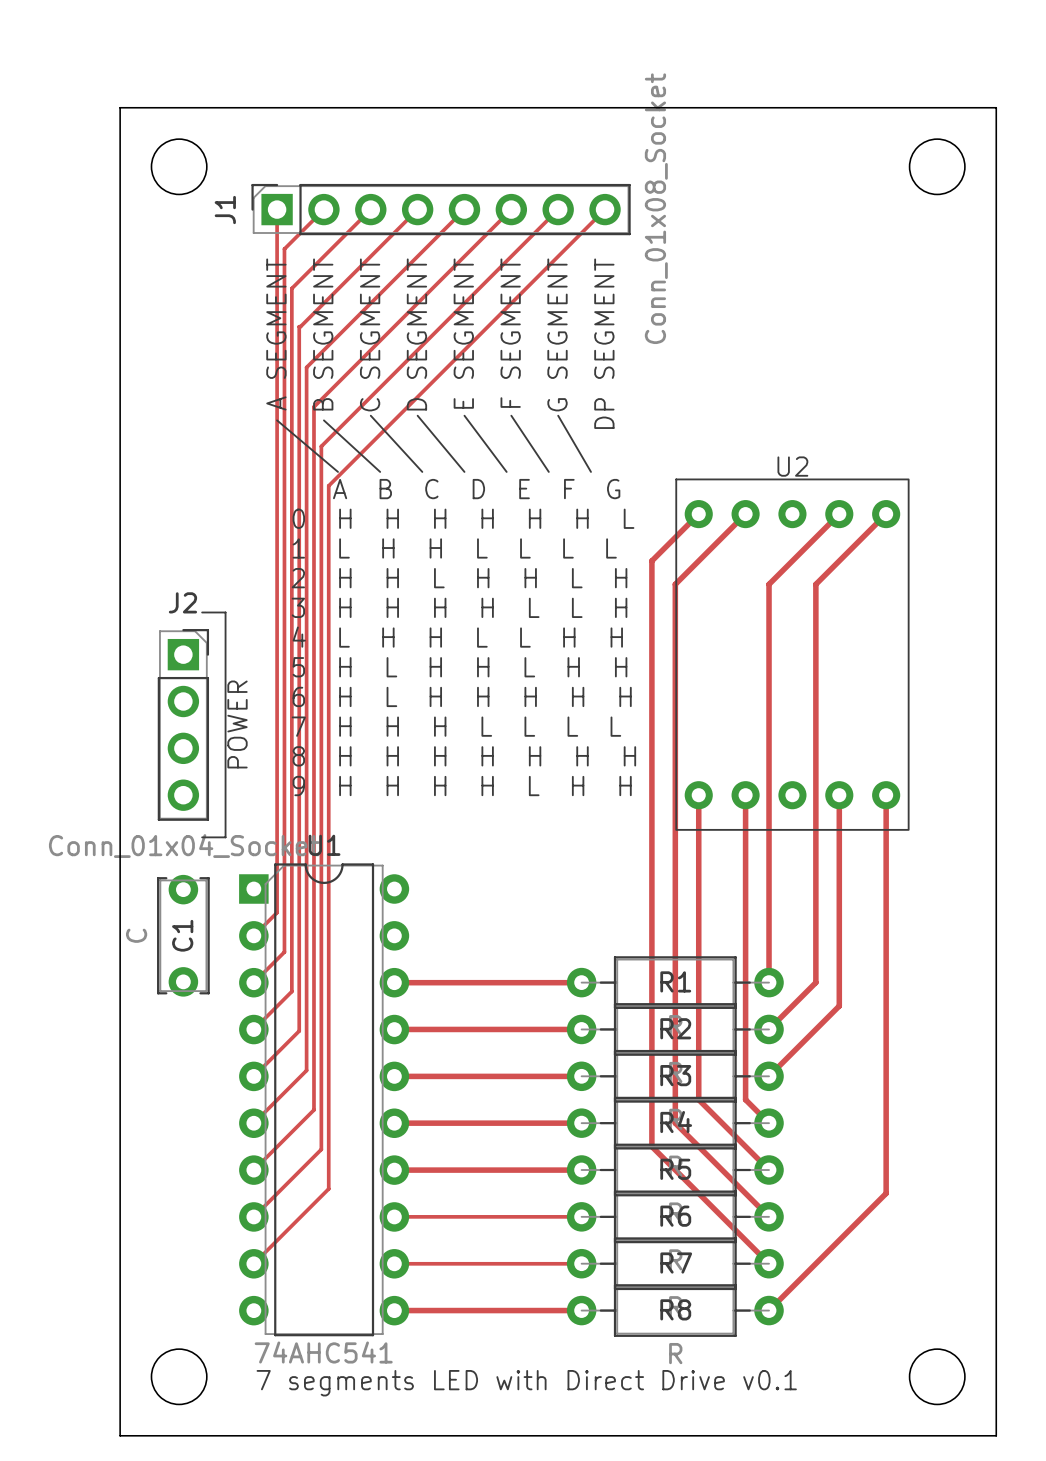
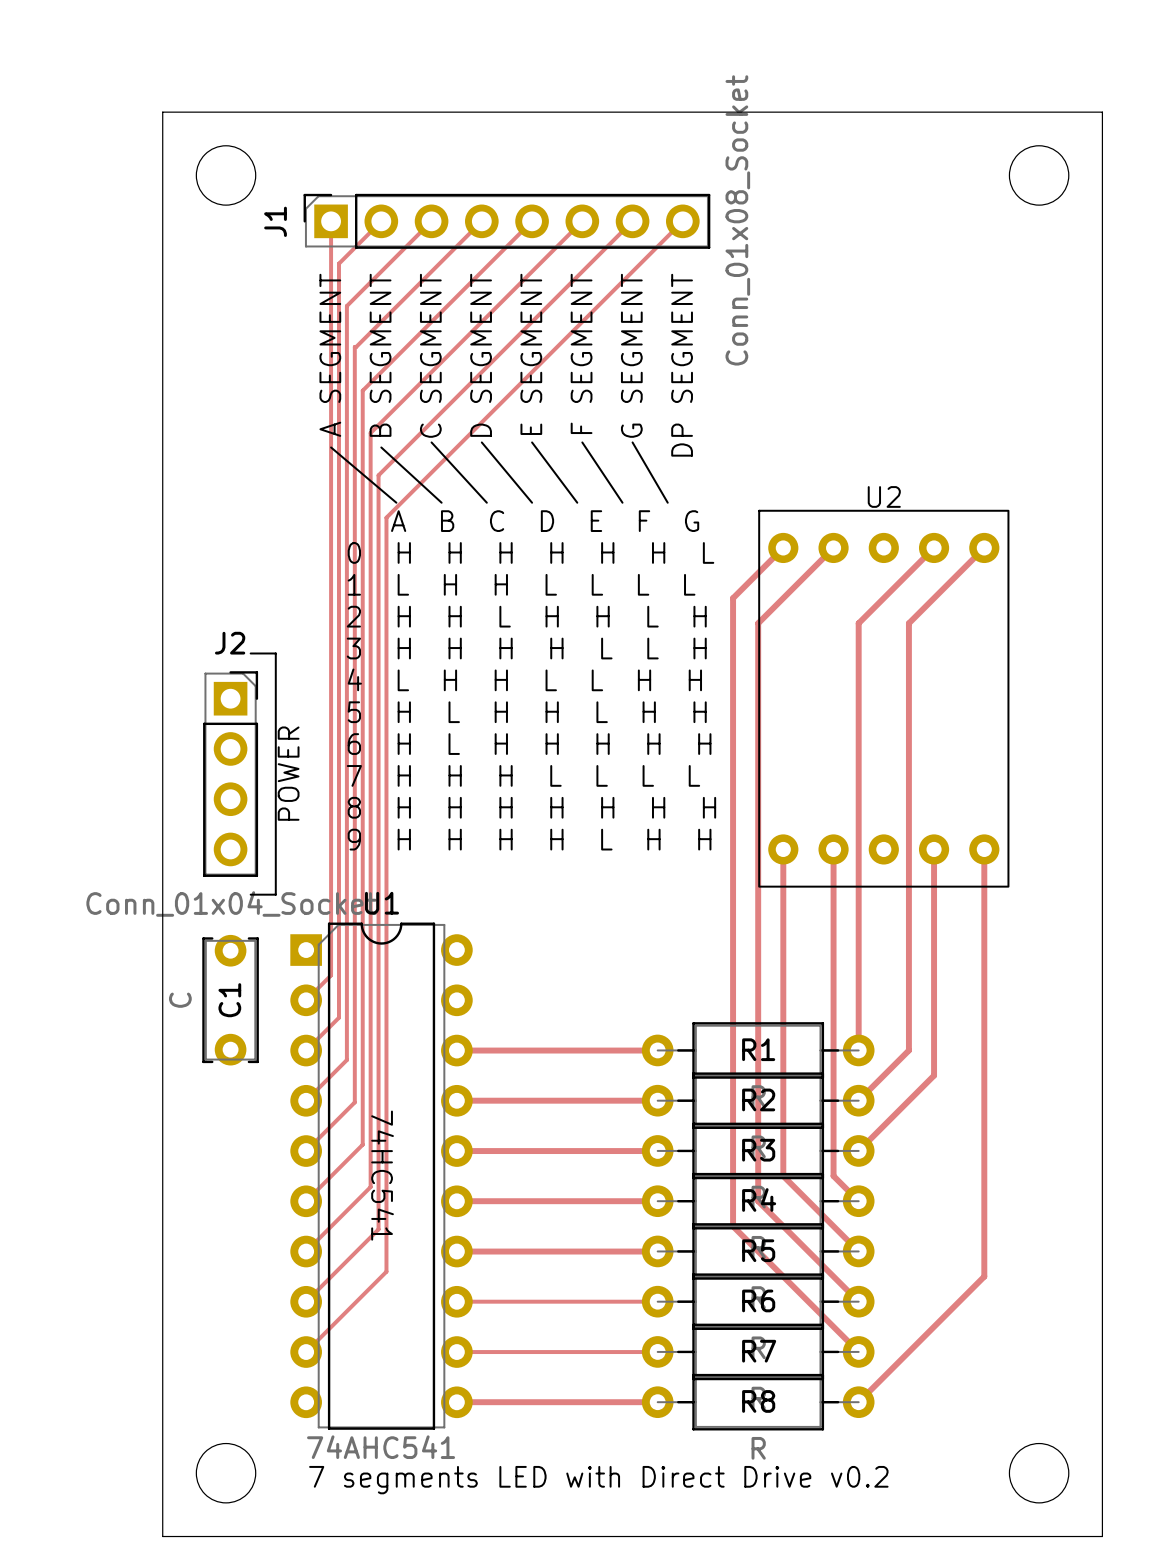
text: none -> 74HC541 (382, 1175)
text: 7 segments LED with Direct Drive v0.1 (526, 1383) -> 7 segments LED with Direct Drive v0.2 (598, 1480)

